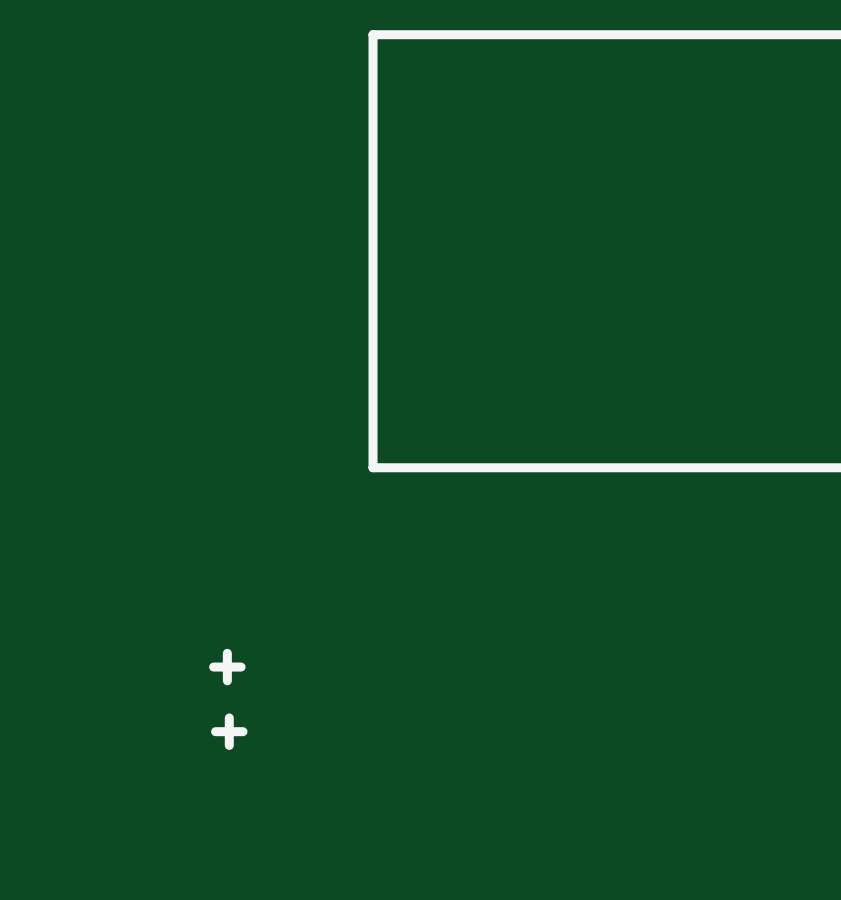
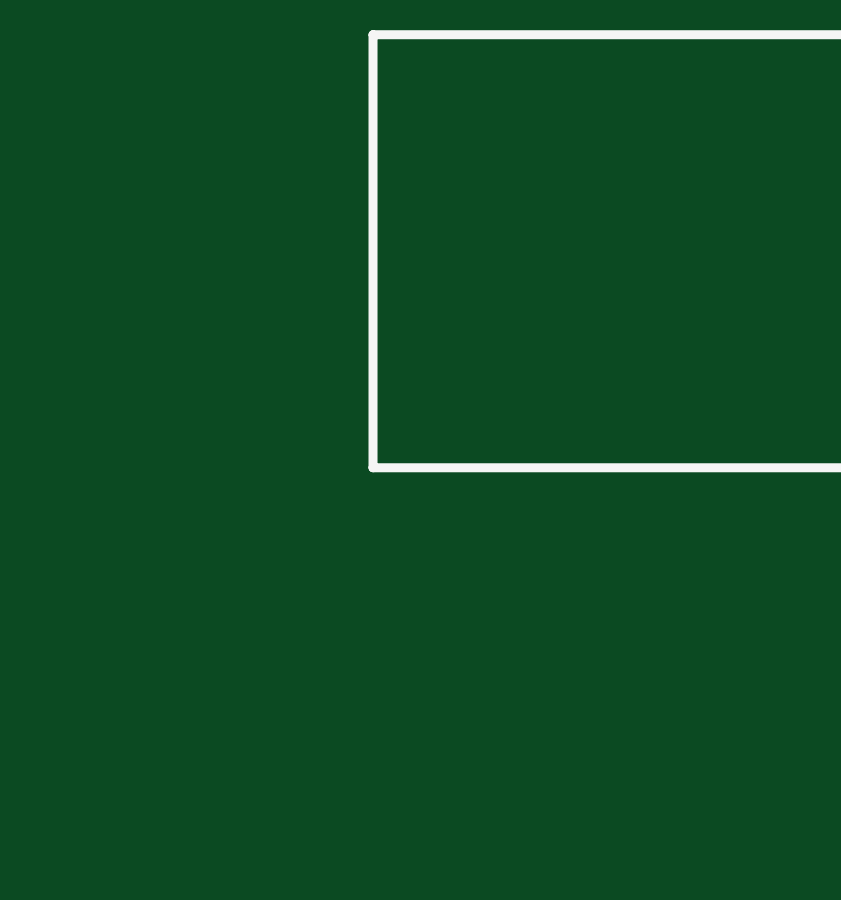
text: + (227, 667) -> none
text: + (229, 731) -> none

